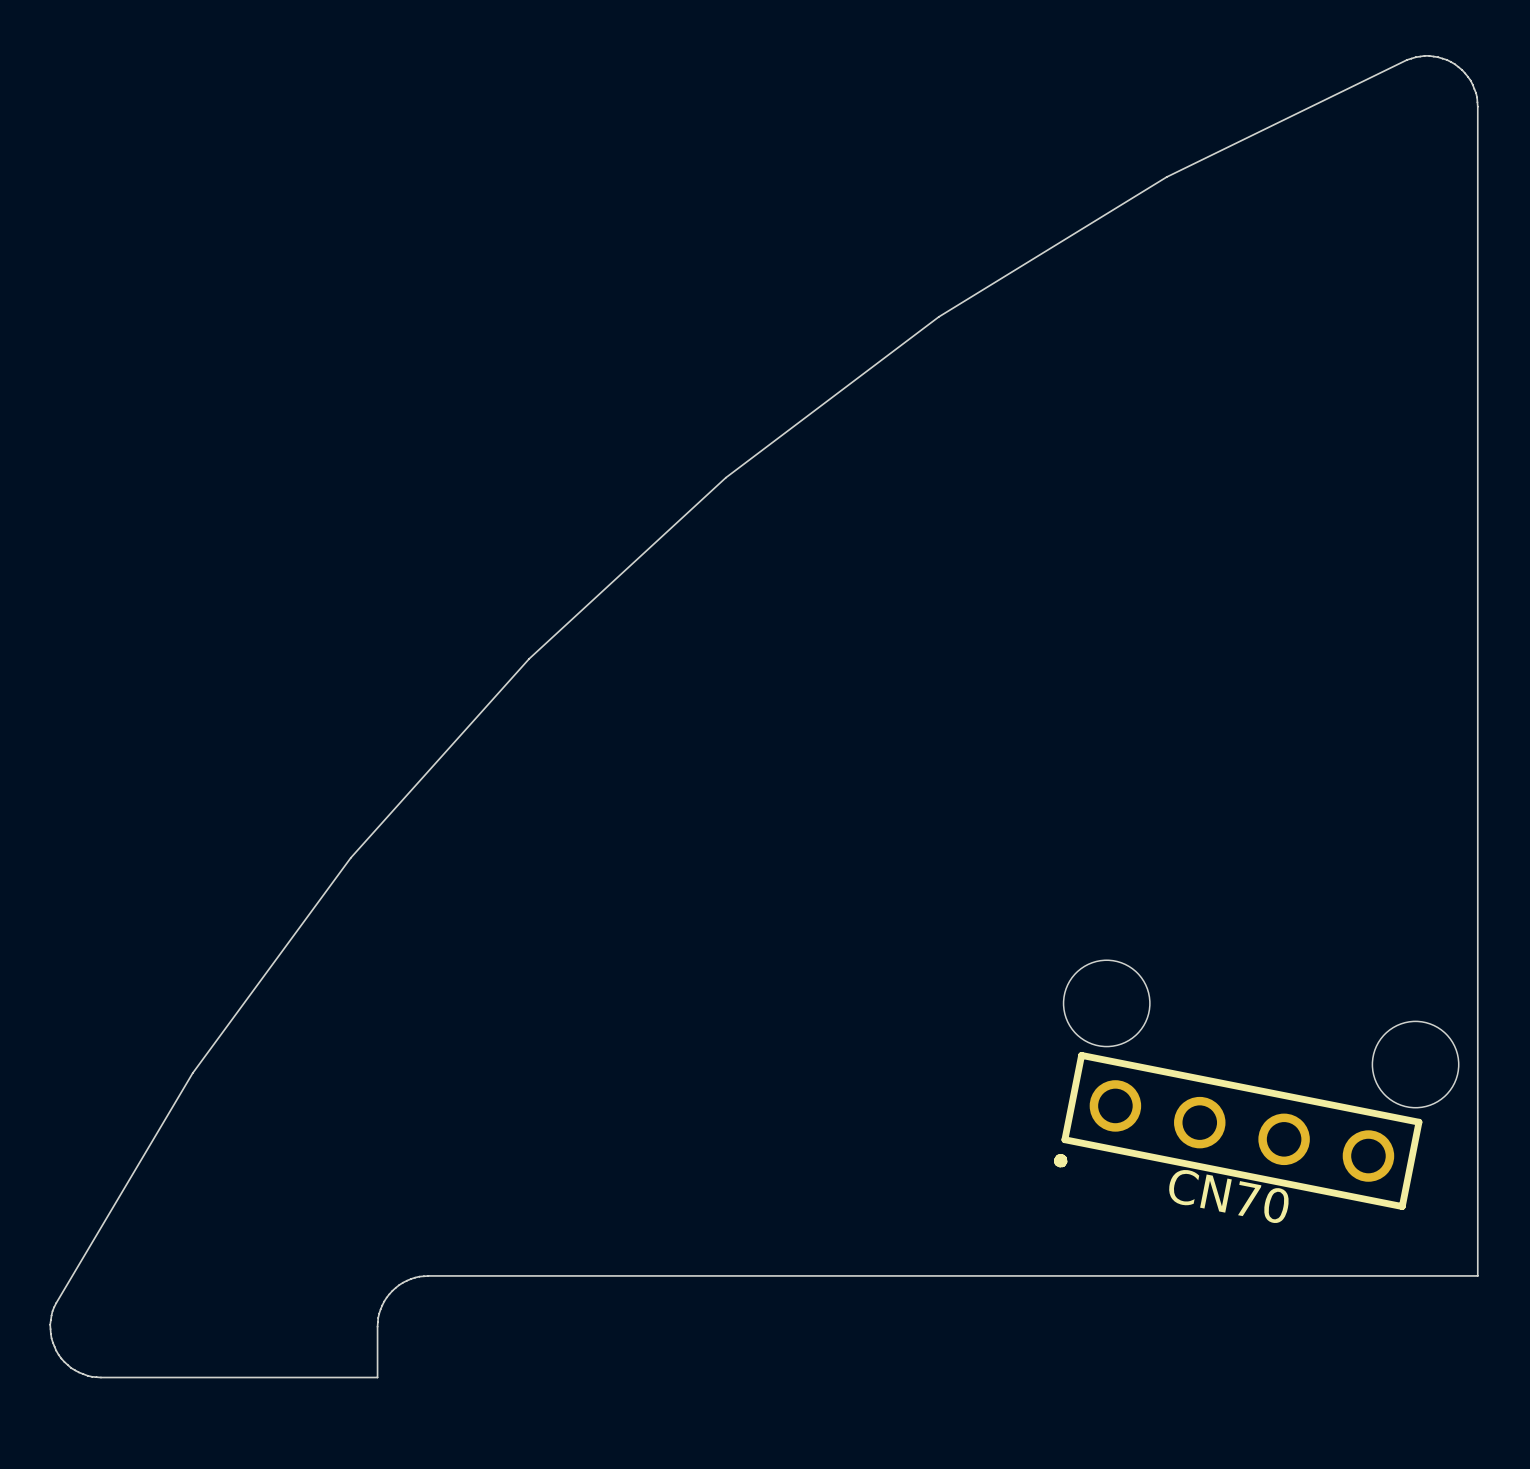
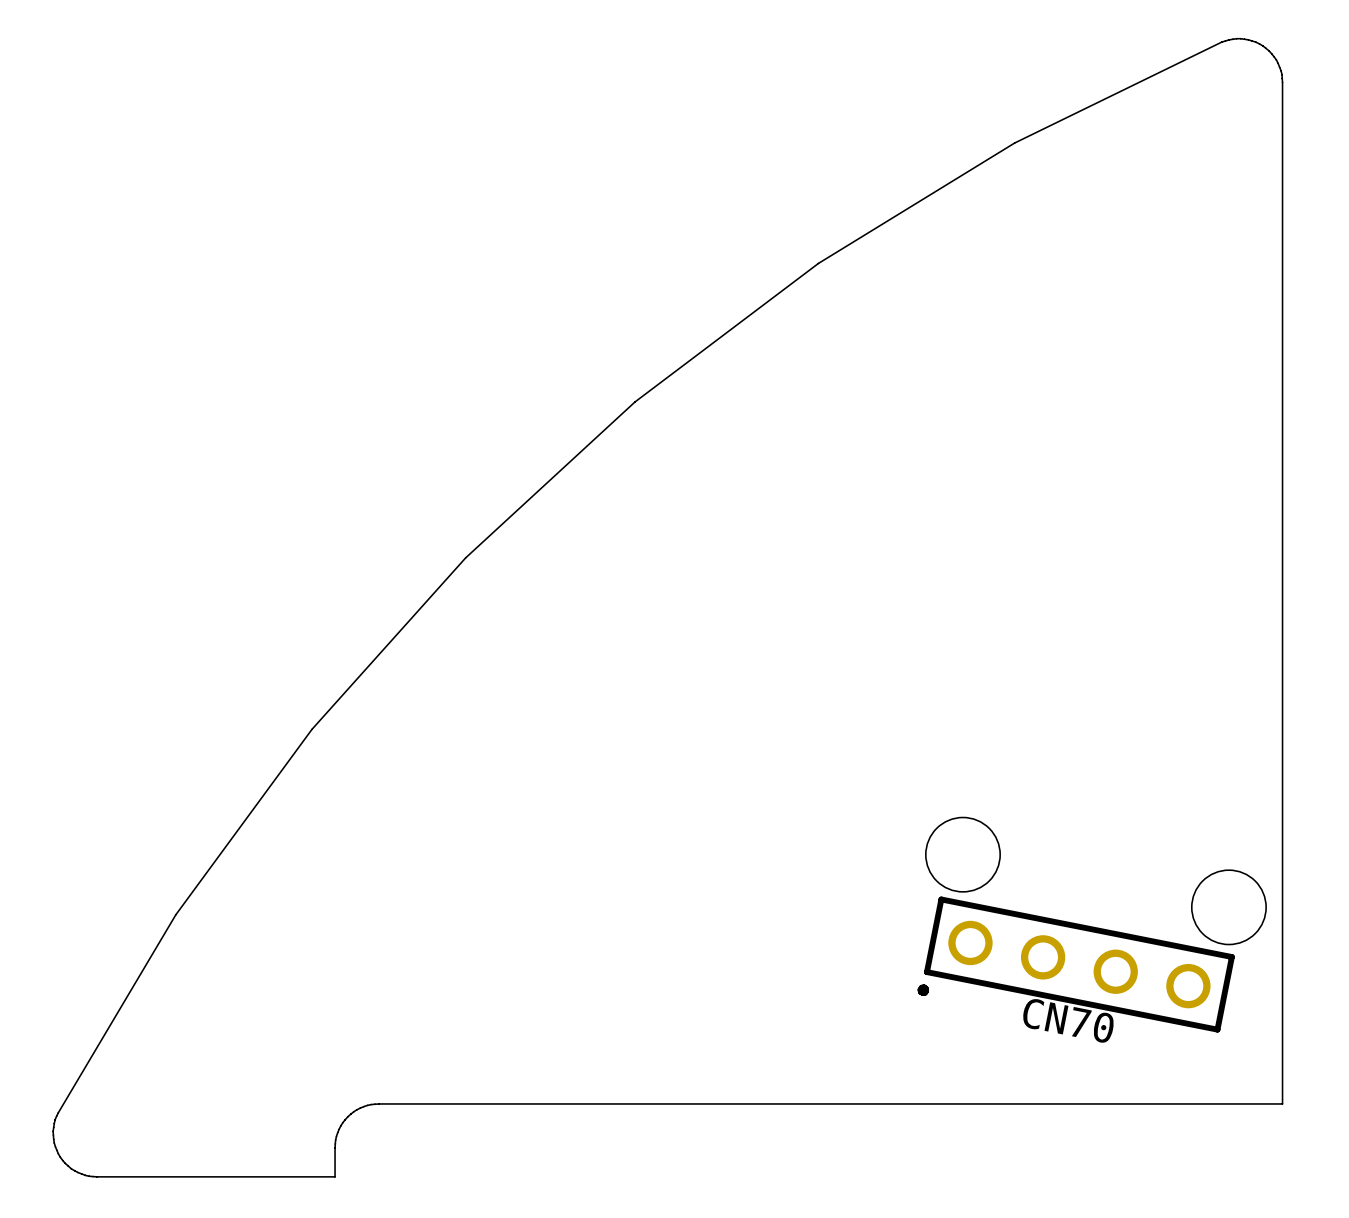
board edge: (1477, 1275) (428, 1275) (415, 1277) (402, 1282) (386, 1297) (378, 1317) (377, 1343) -> (1282, 1089) (1282, 1103) (378, 1103) (363, 1106) (347, 1116) (337, 1132) (335, 1147)

